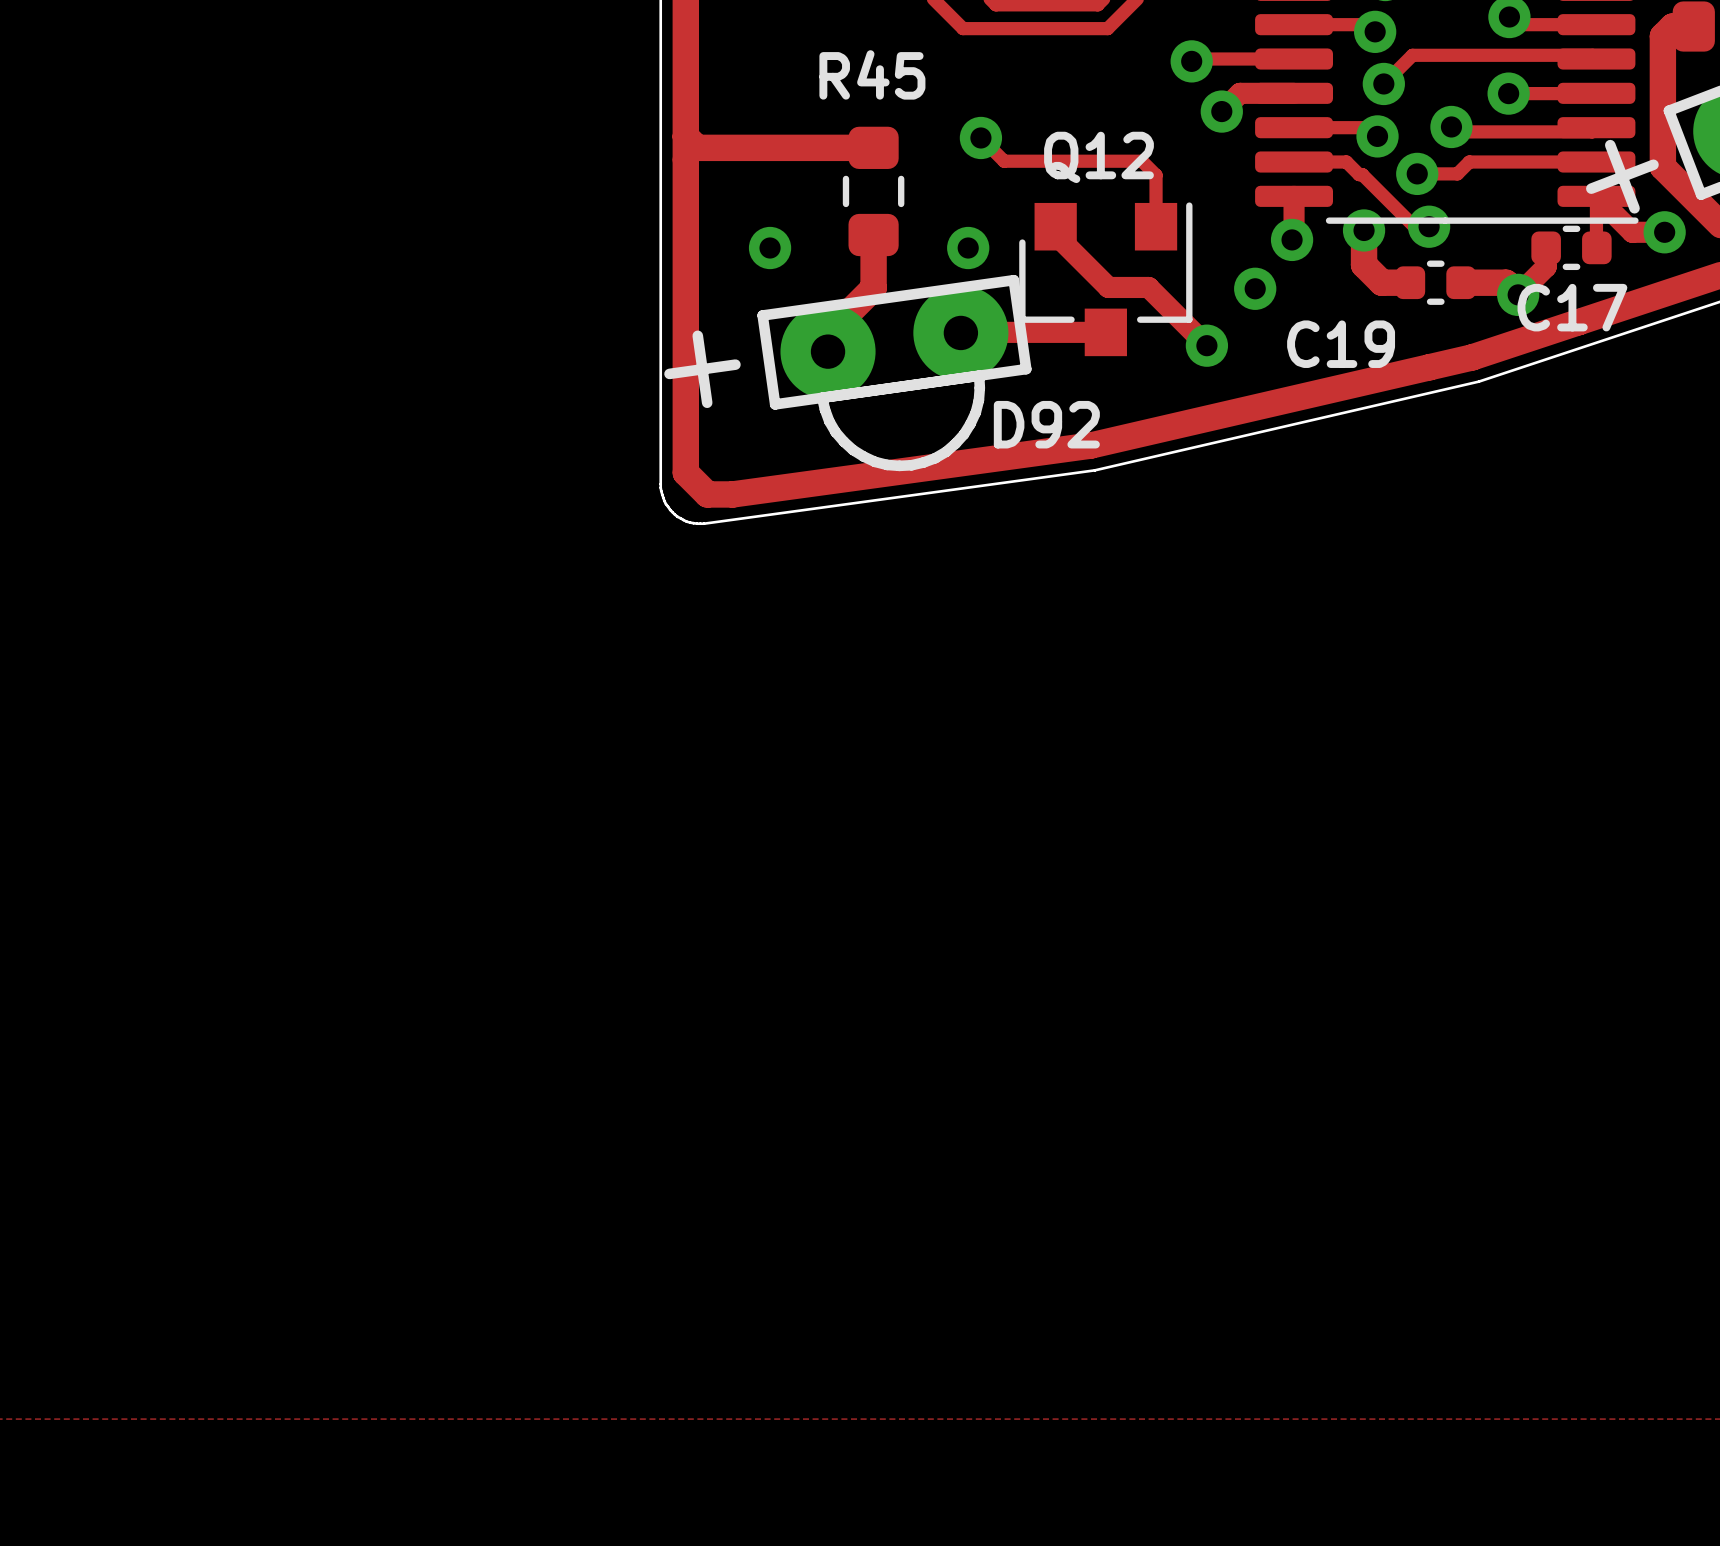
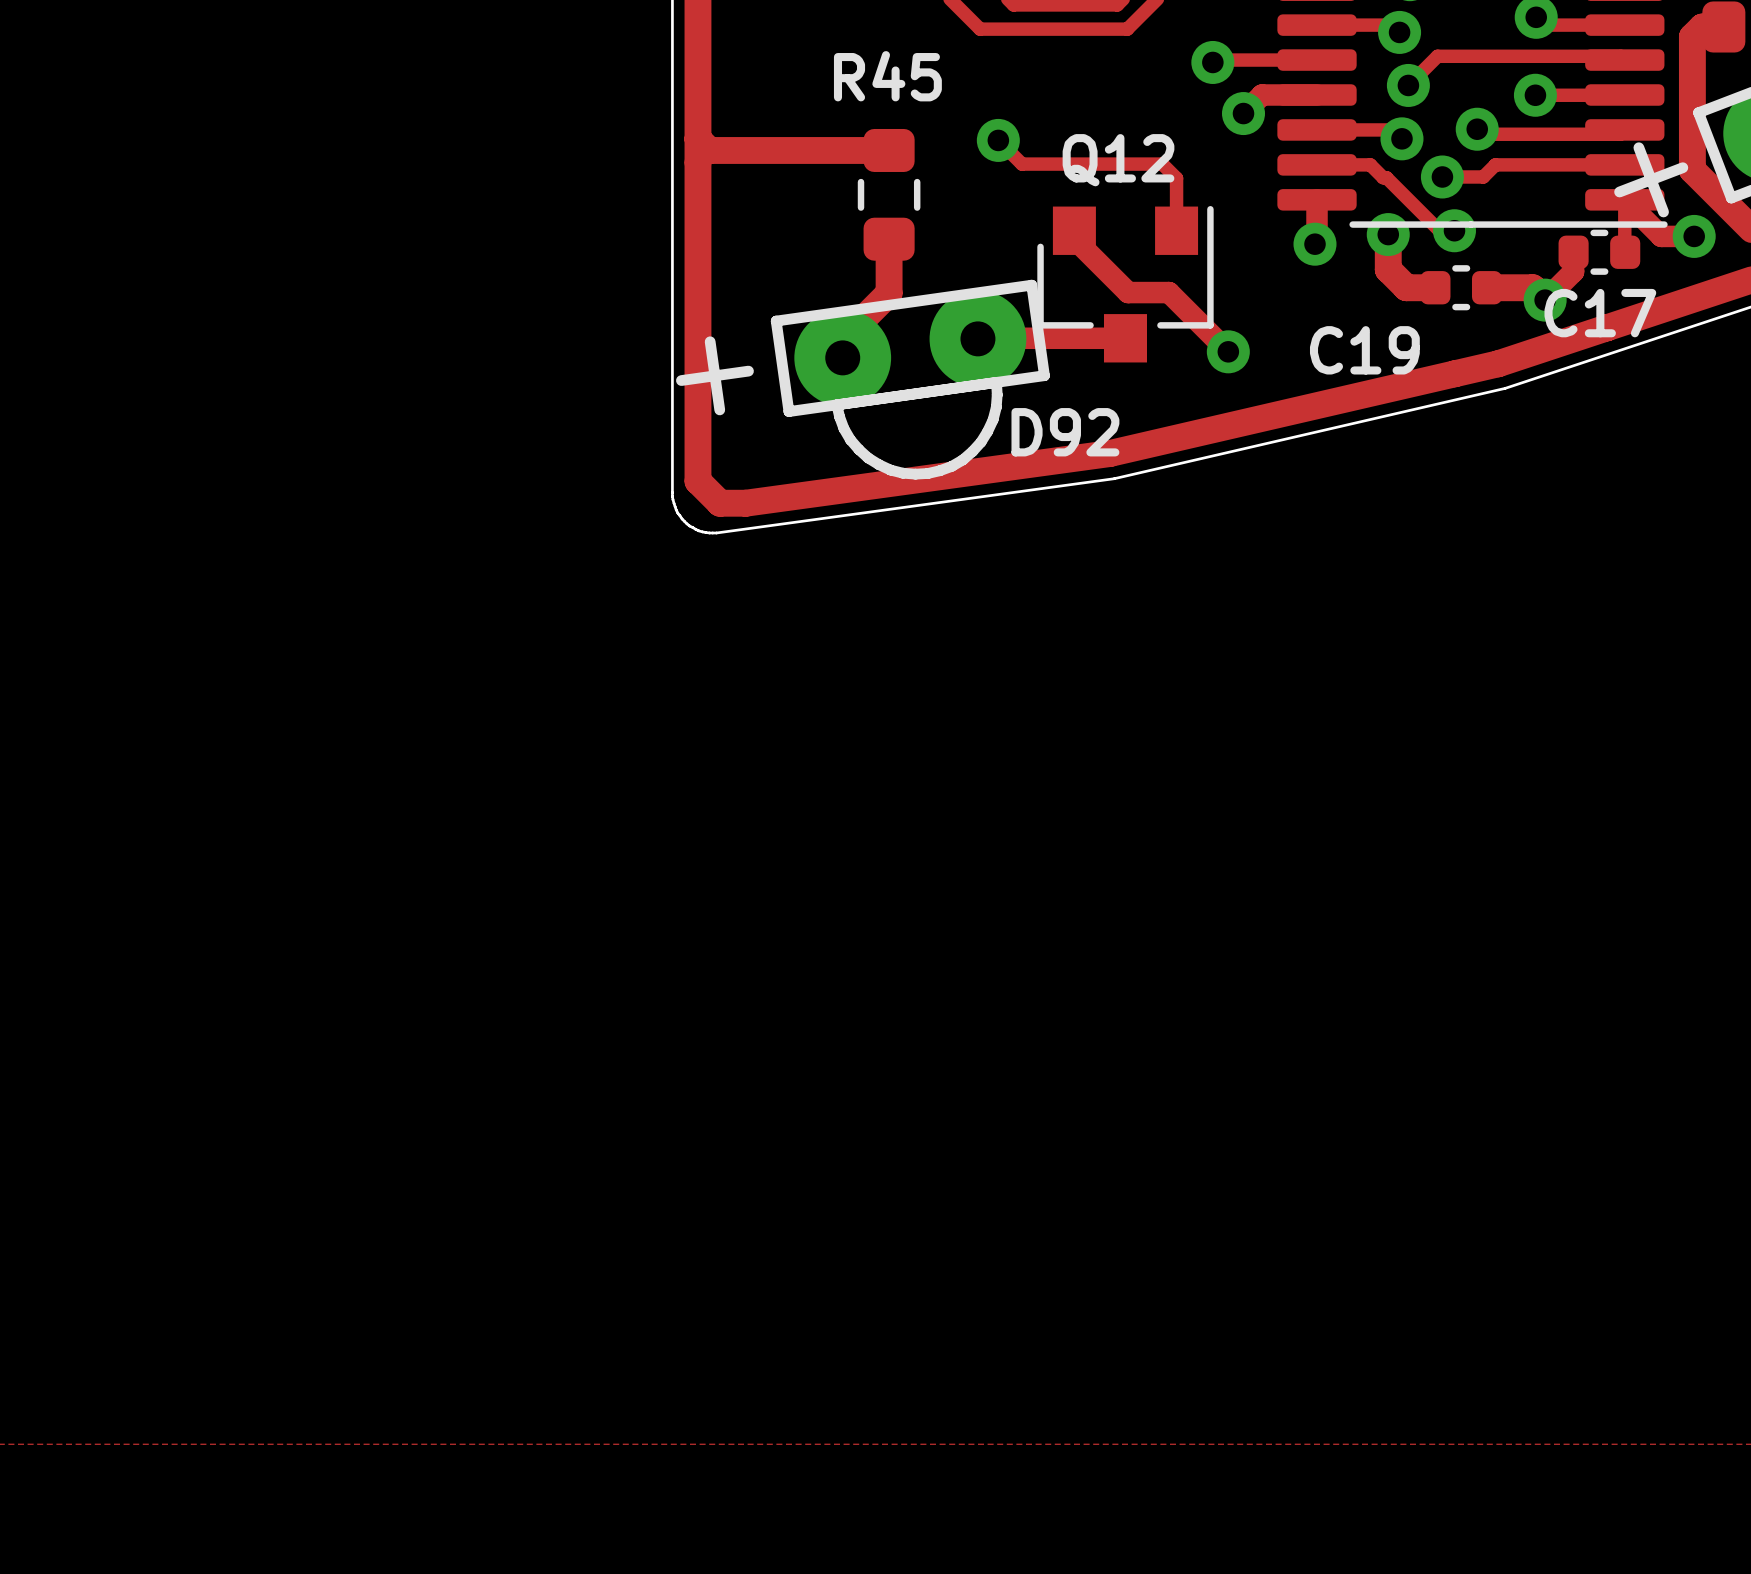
via: (770, 248) -> none
via: (968, 248) -> none
via: (1255, 288) -> none

